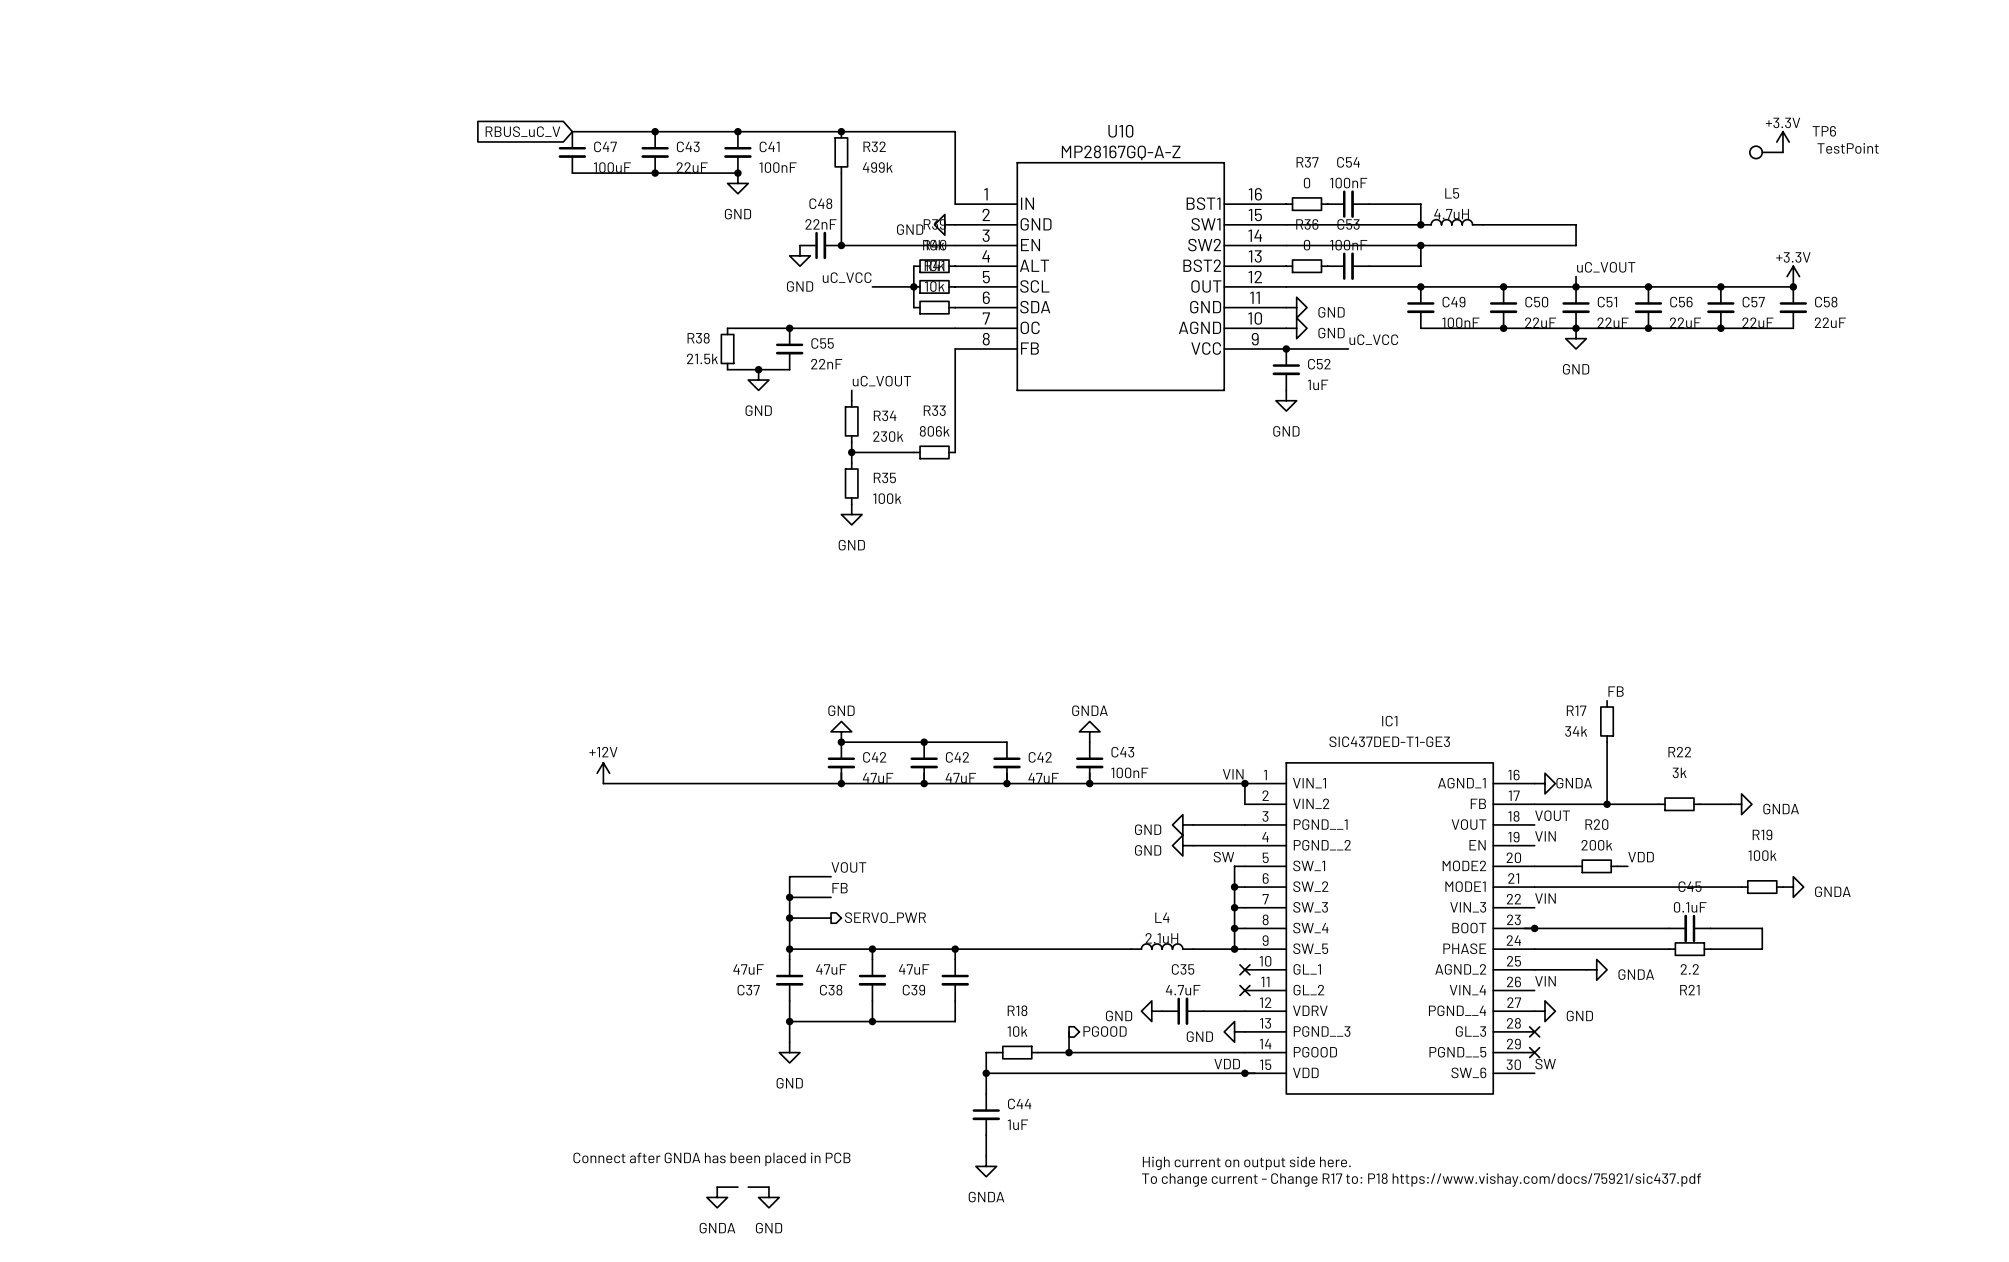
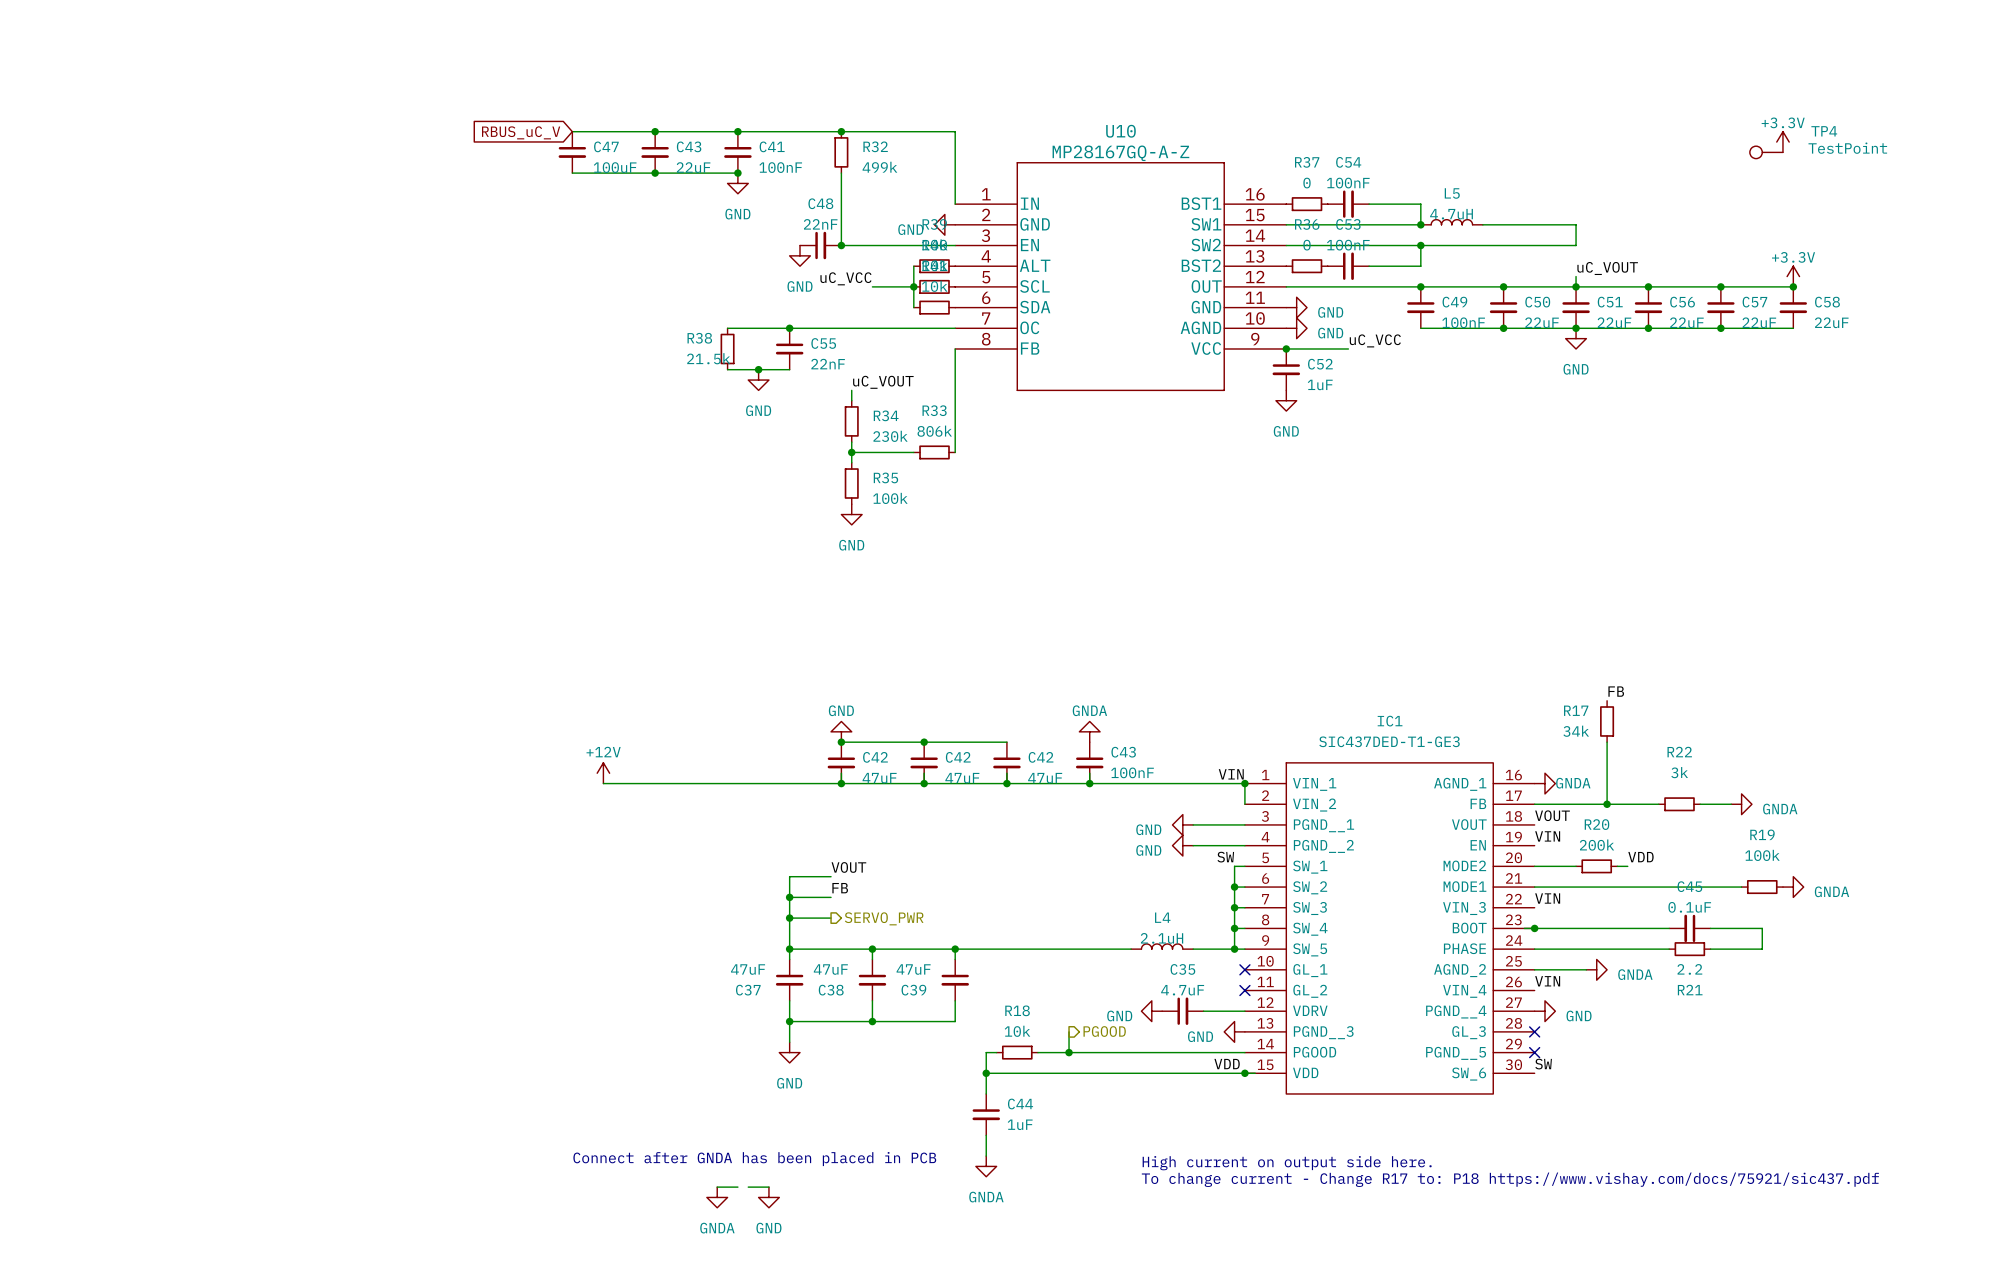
TP6 name: TP6 (1824, 131) -> TP4 (1824, 131)

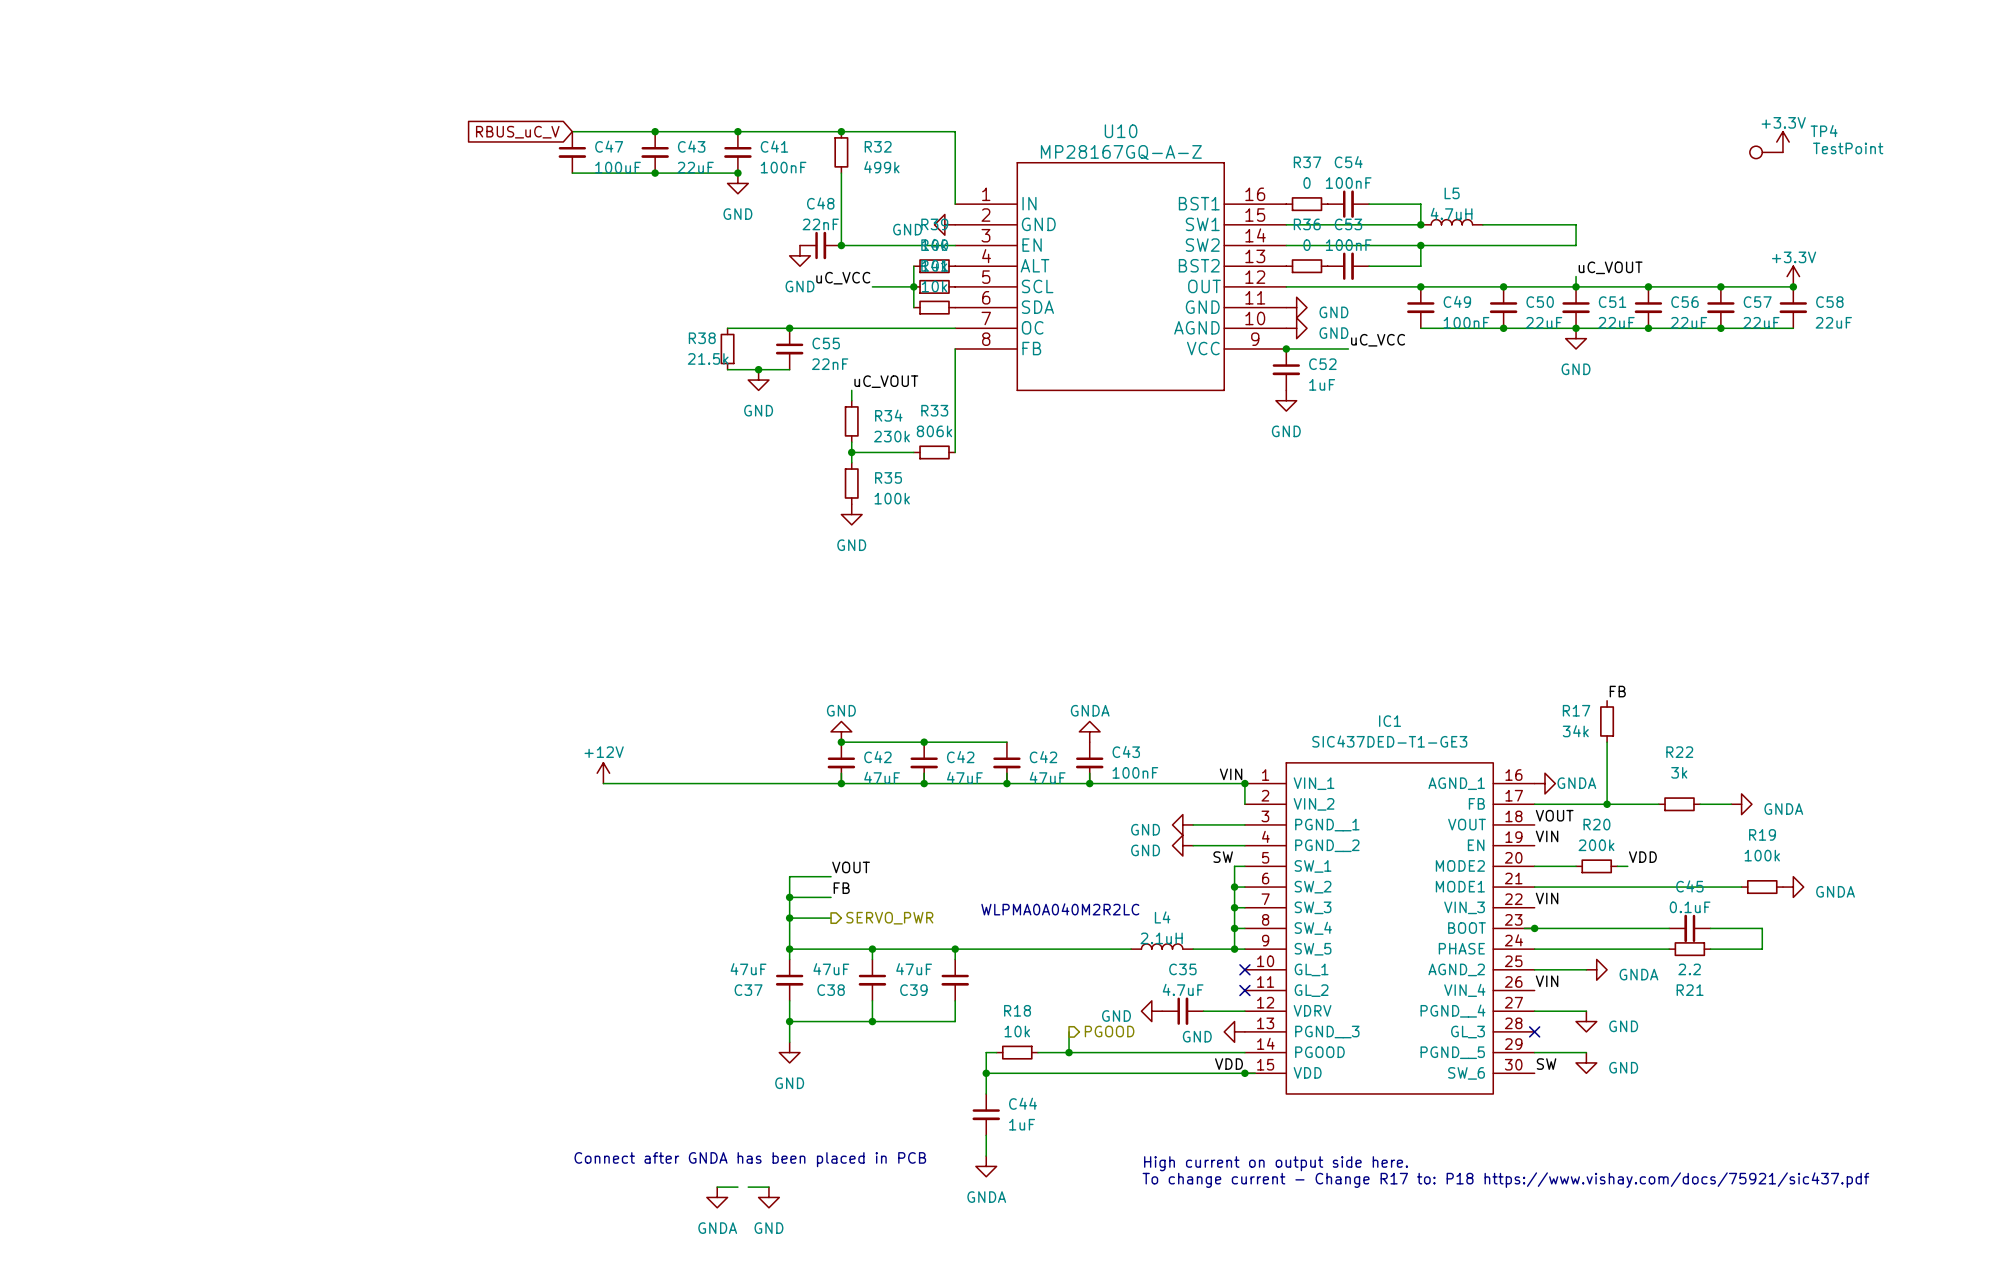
text: none -> WLPMA0A040M2R2LC (1060, 909)
wire: none -> (1534, 1011) (1586, 1011)
power symbol: GND (1544, 1011) -> none
power symbol: none -> GND (1586, 1021)
wire: none -> (1534, 1052) (1586, 1052)
no-connect mark: (1534, 1052) -> none
power symbol: none -> GND (1586, 1062)

